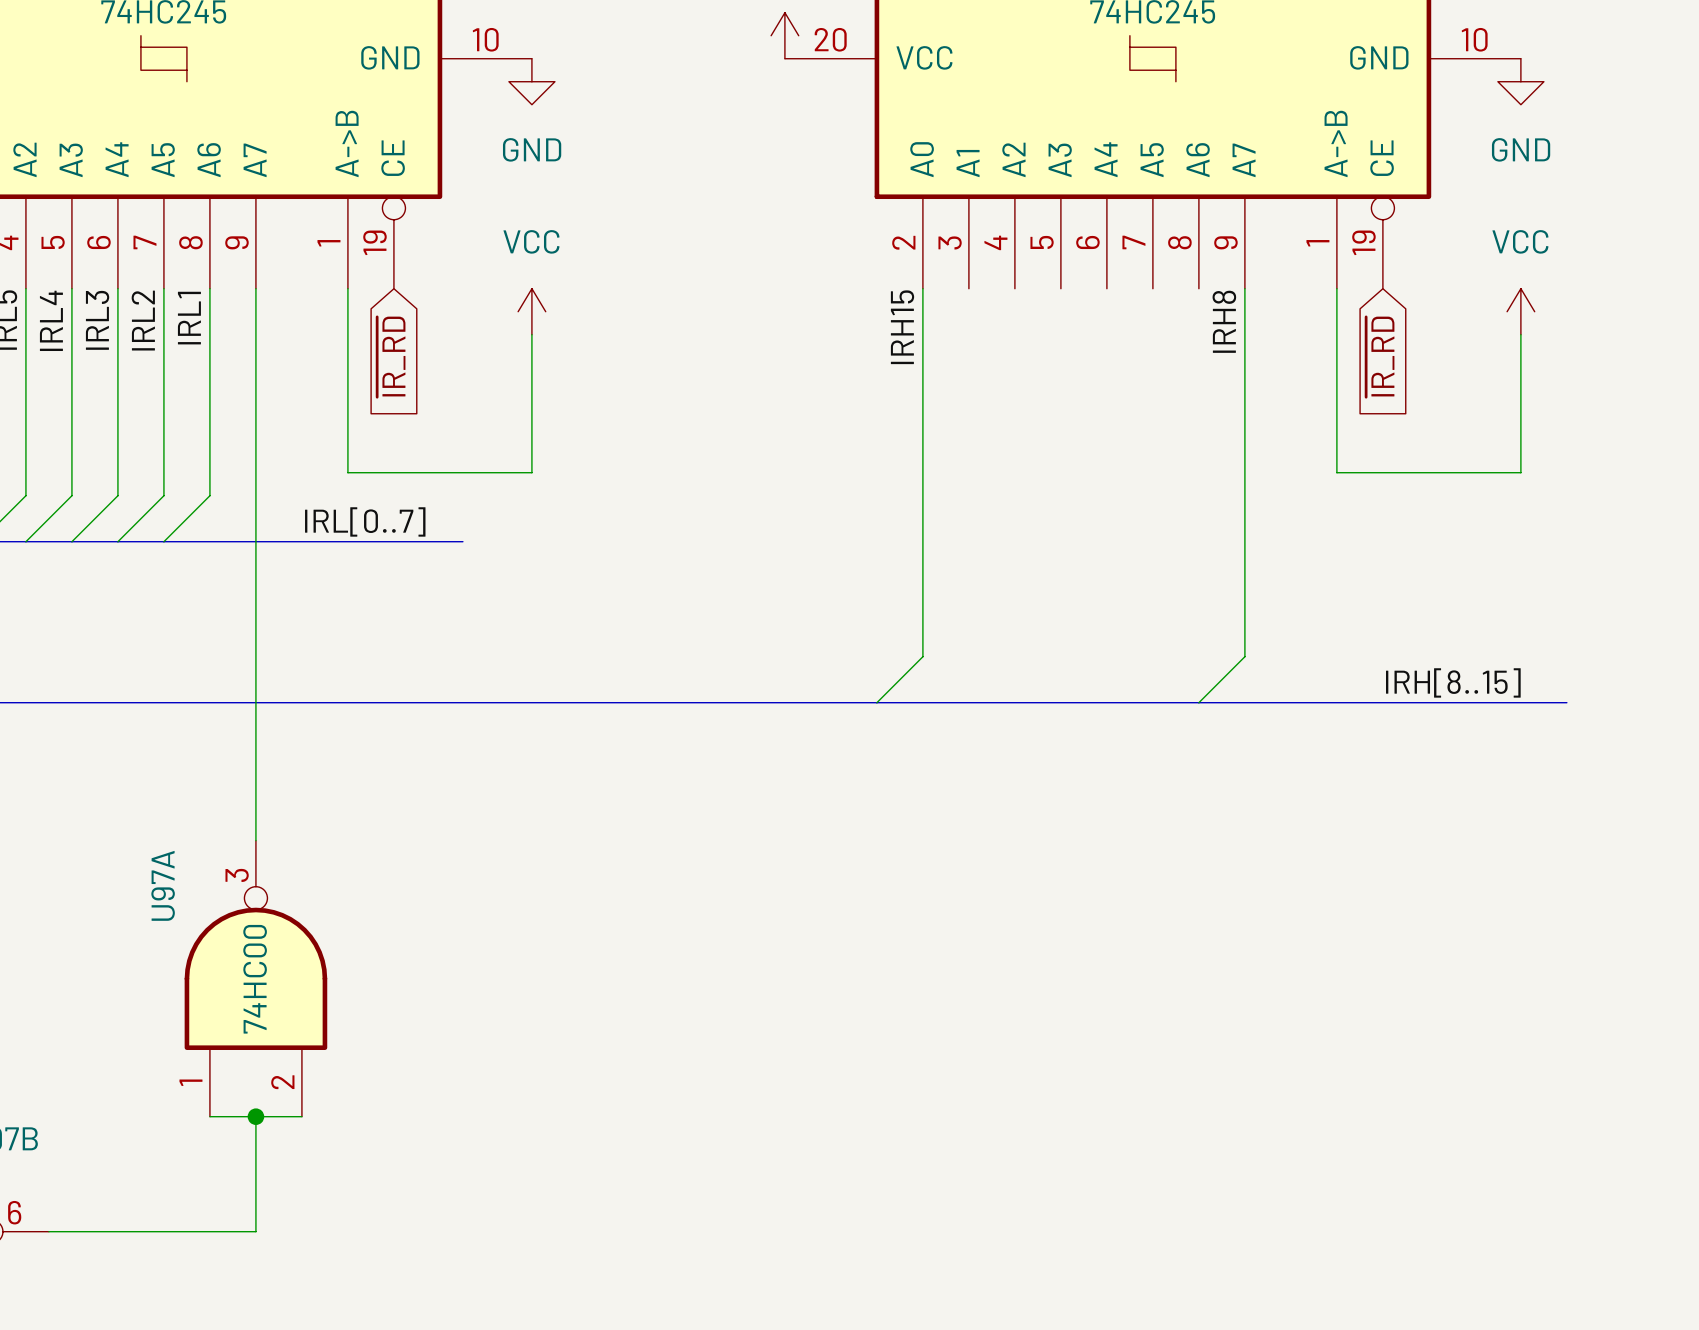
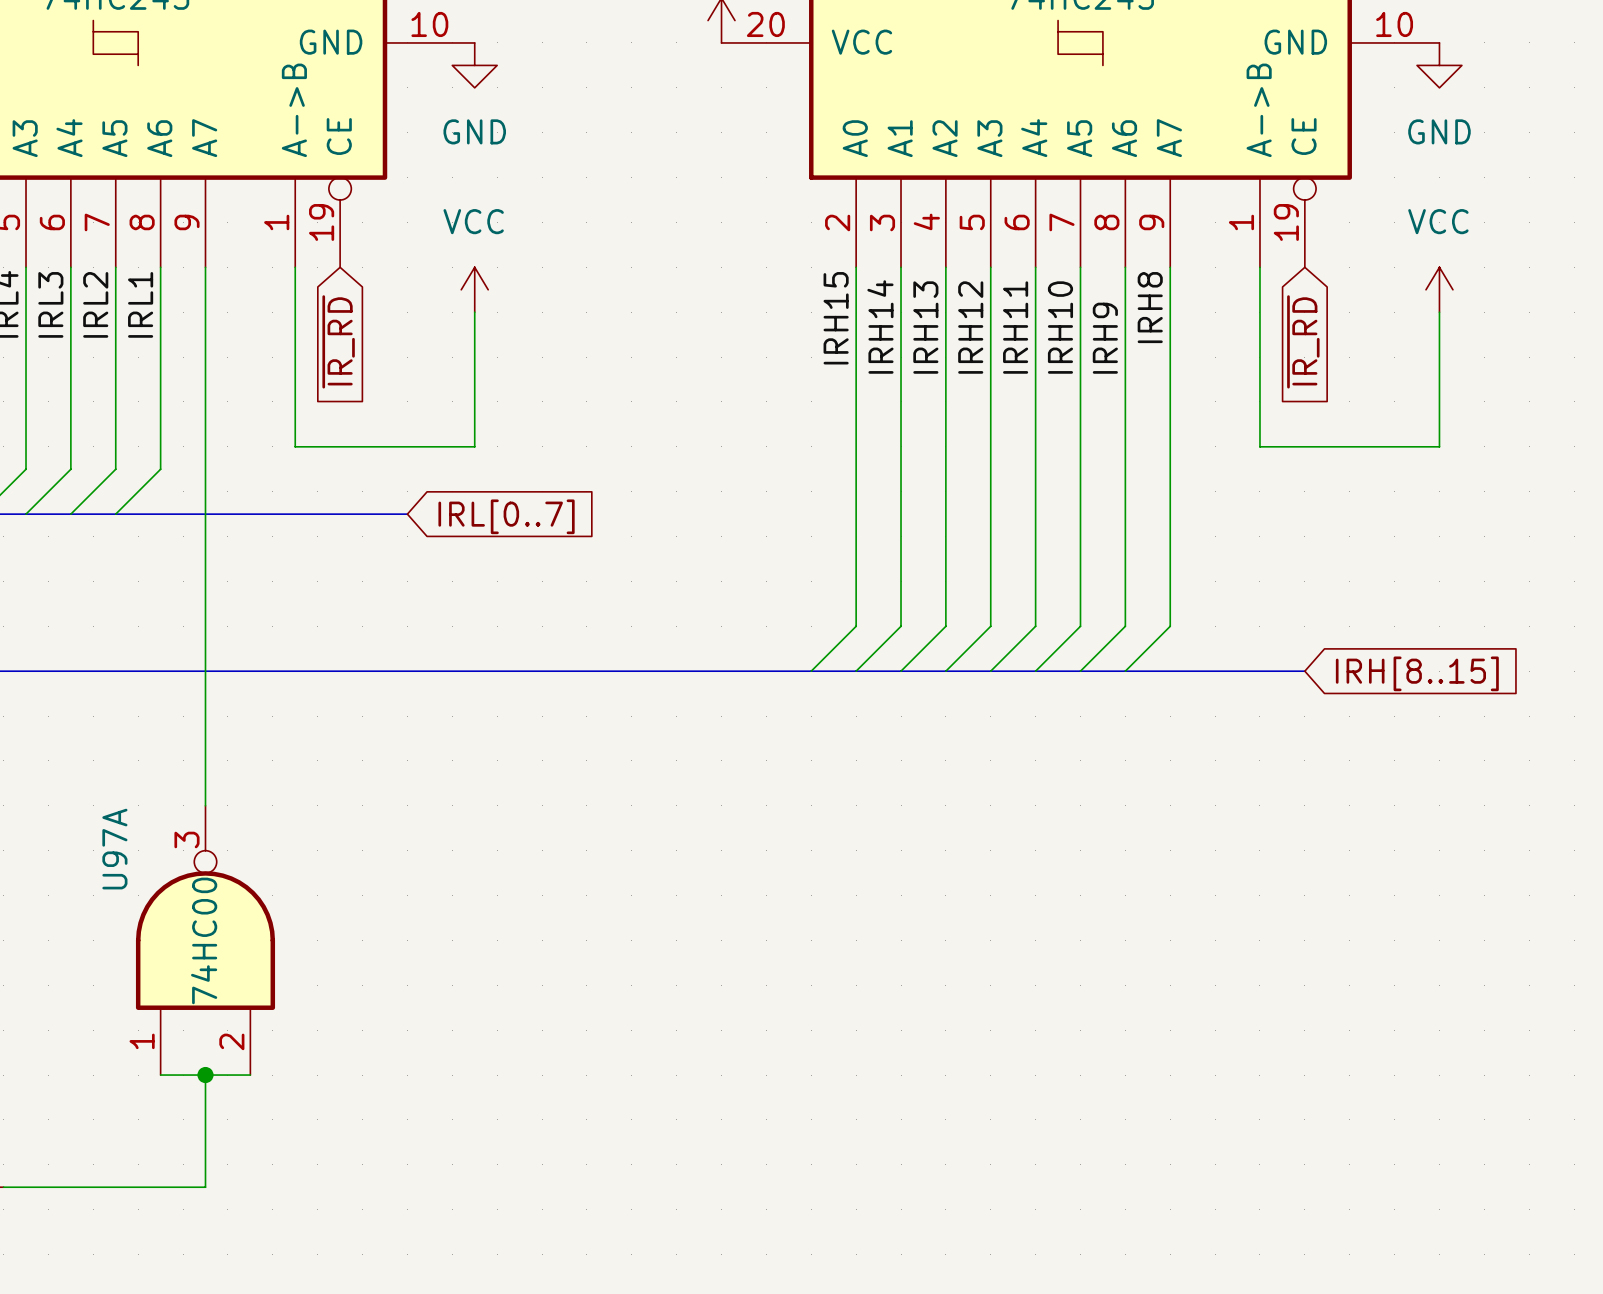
wire: none -> (901, 267) (901, 626) (856, 671)
wire: none -> (945, 267) (945, 626) (901, 671)
wire: none -> (990, 267) (990, 626) (945, 671)
wire: none -> (1035, 267) (1035, 626) (990, 671)
wire: none -> (1080, 267) (1080, 626) (1035, 671)
wire: none -> (1125, 267) (1125, 626) (1080, 671)
label: none -> IRH14 (880, 327)
label: none -> IRH13 (925, 327)
label: none -> IRH12 (970, 327)
label: none -> IRH10 (1060, 327)
label: none -> IRH11 (1015, 327)
label: none -> IRH9 (1105, 338)
label: IRL[0..7] (365, 521) -> none
global label: none -> IRL[0..7] (506, 516)
label: IRH[8..15] (1453, 682) -> none
bus: (1382, 702) (1566, 702) -> none
global label: none -> IRH[8..15] (1417, 673)

